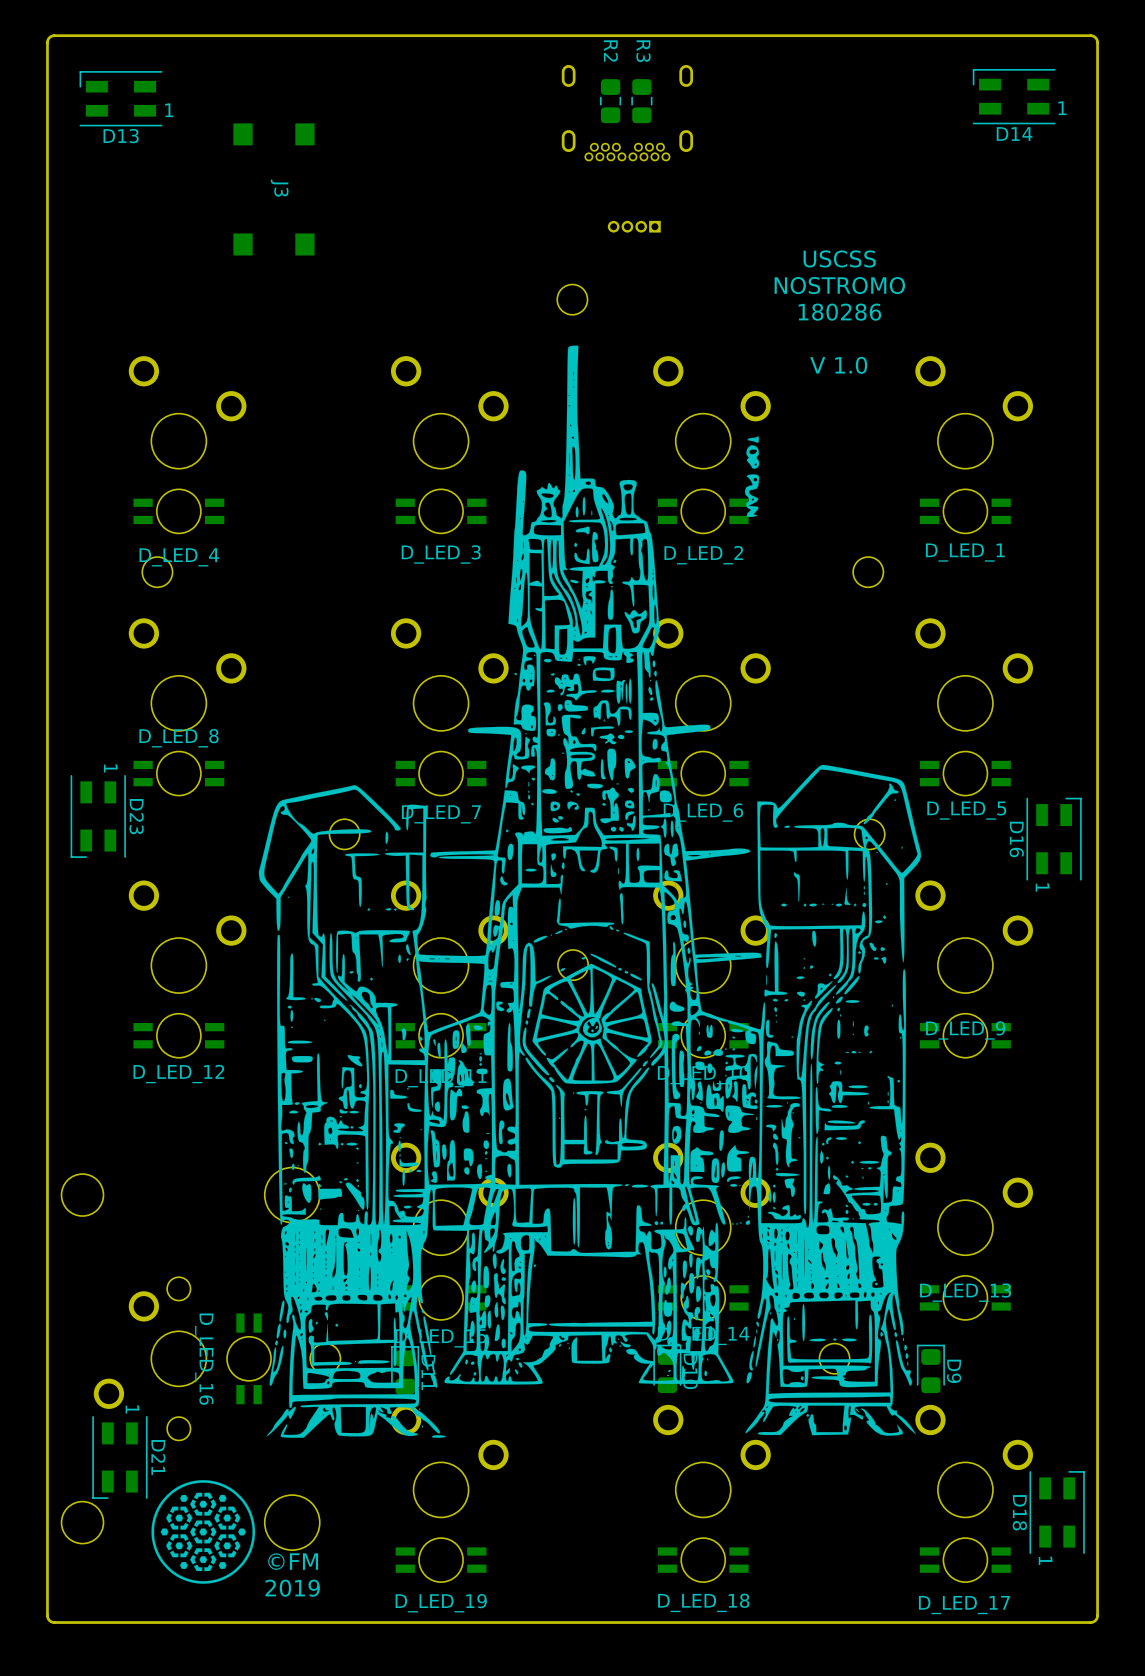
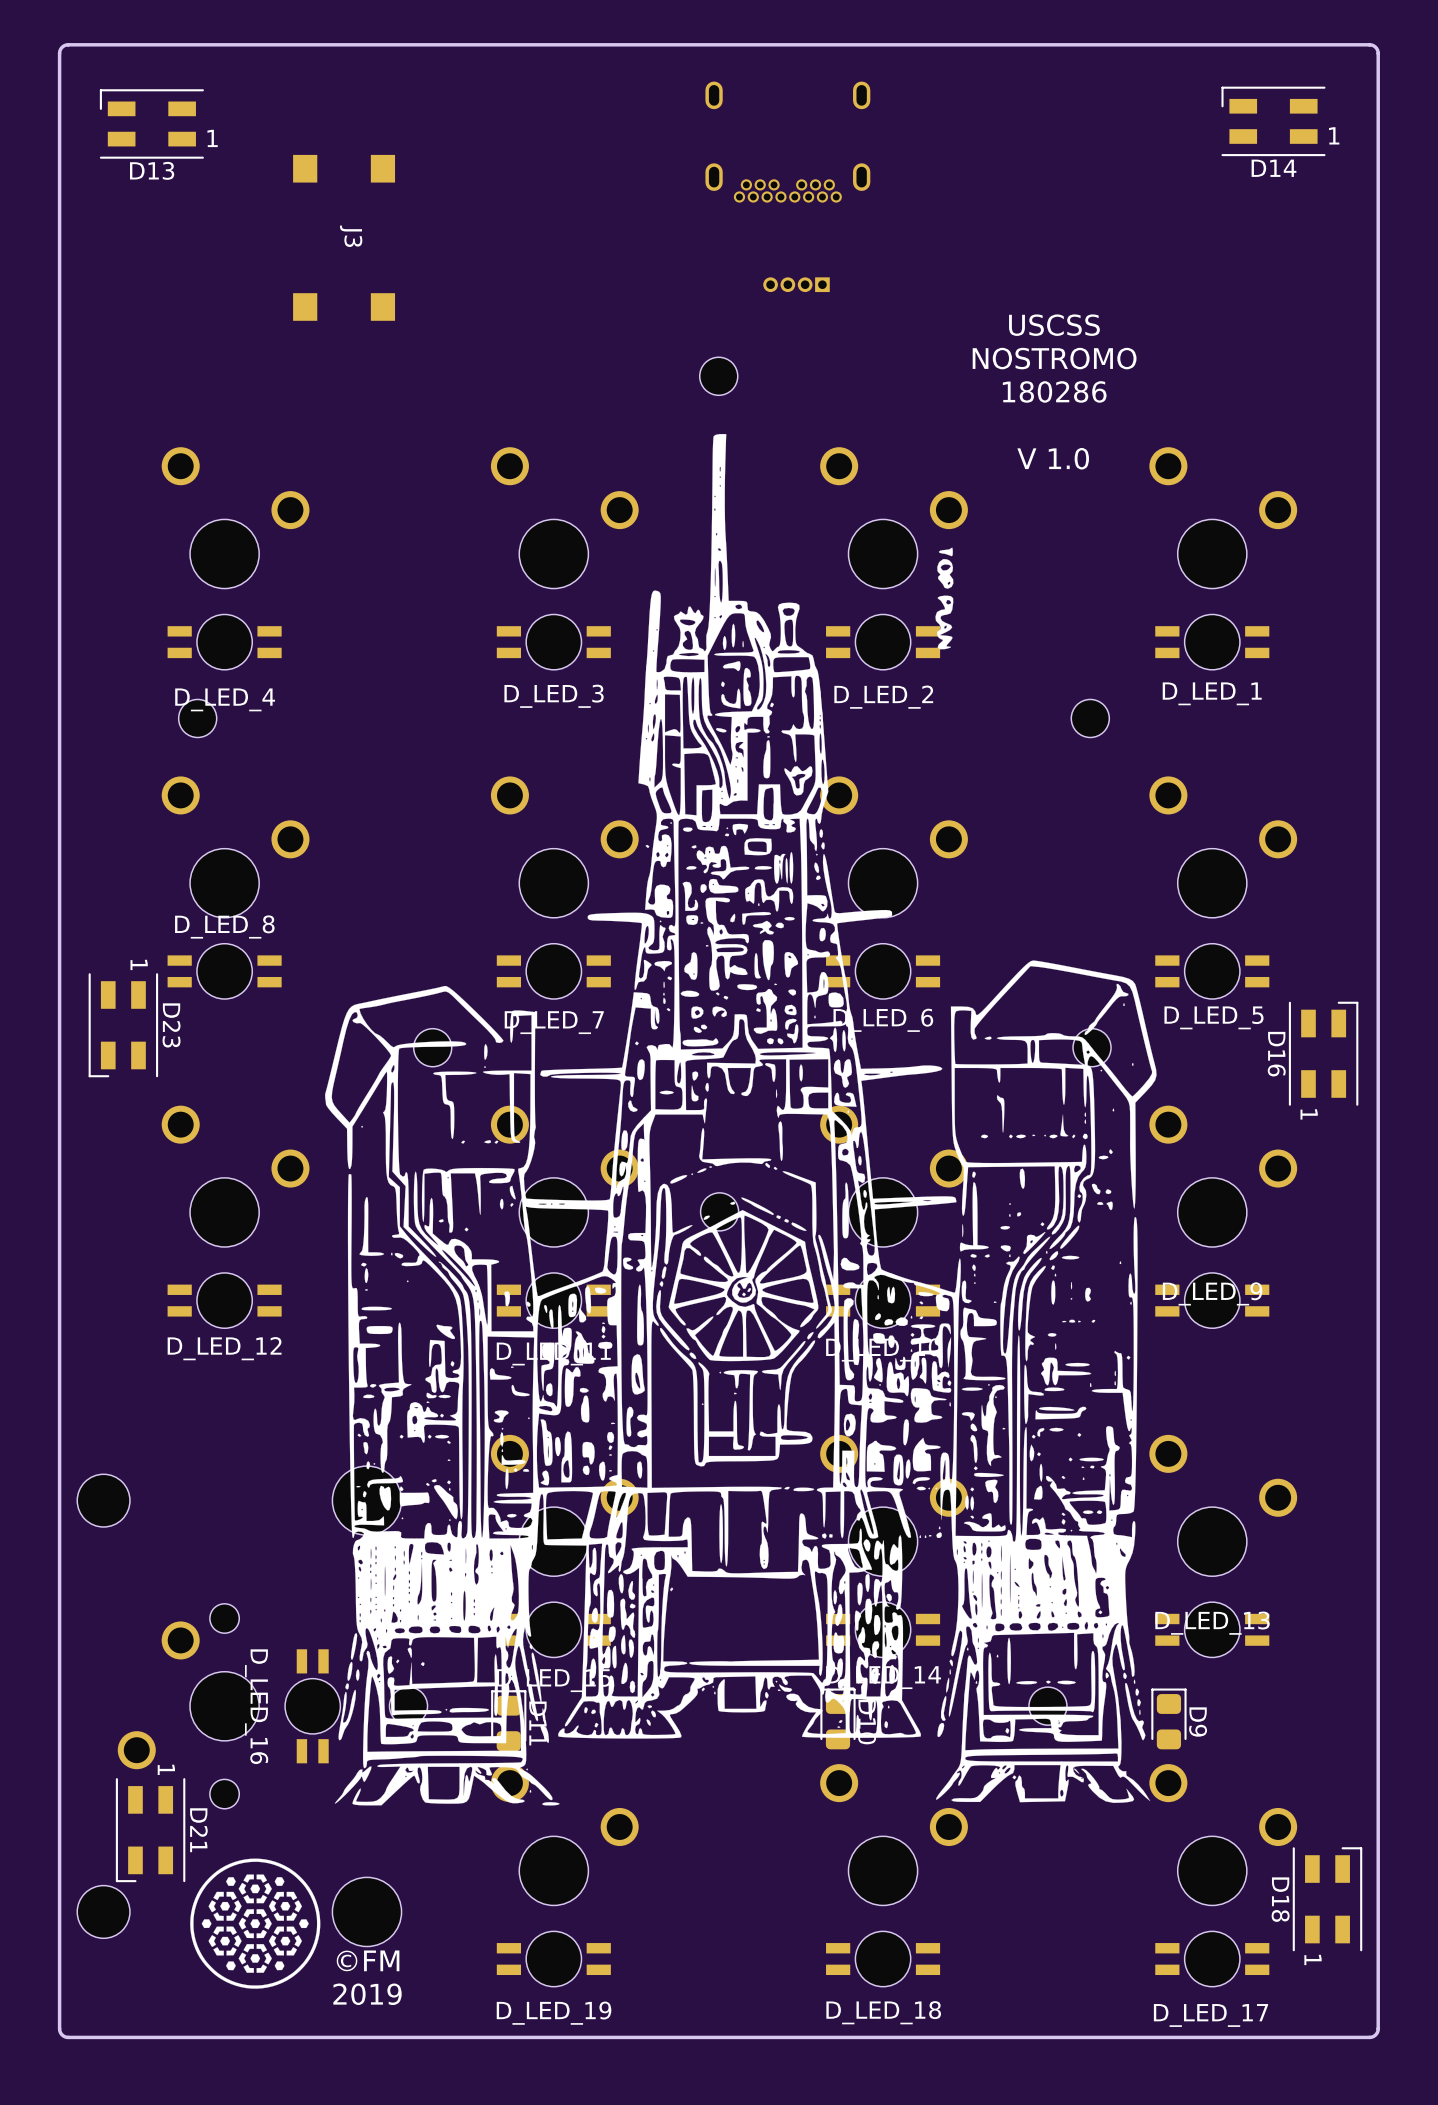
R2: (610, 101) -> none
R3: (641, 101) -> none

